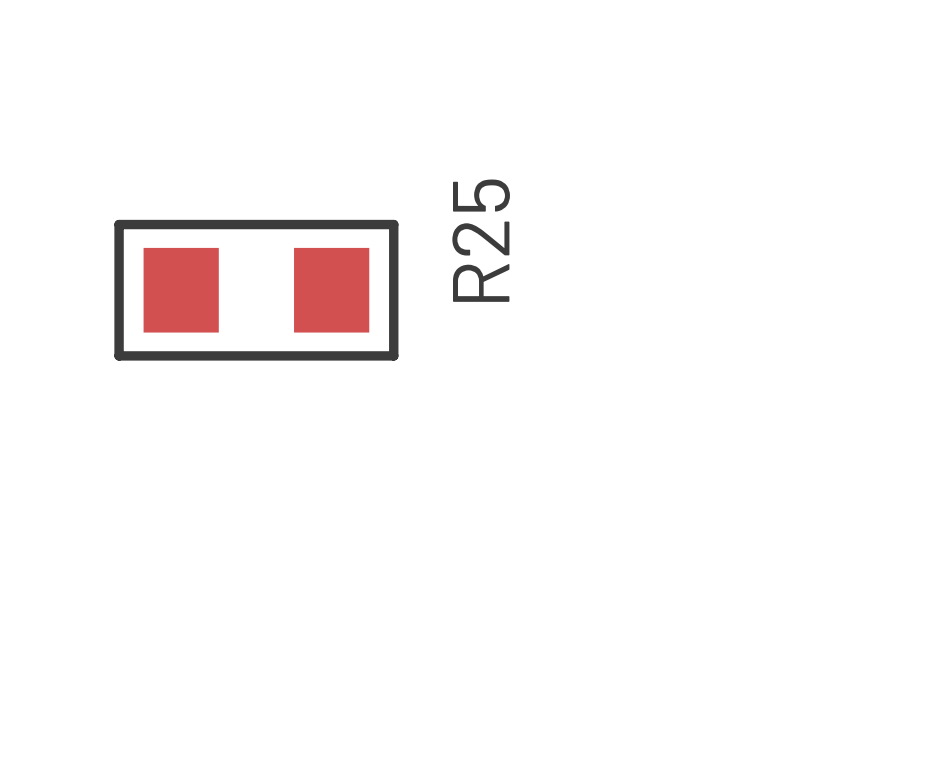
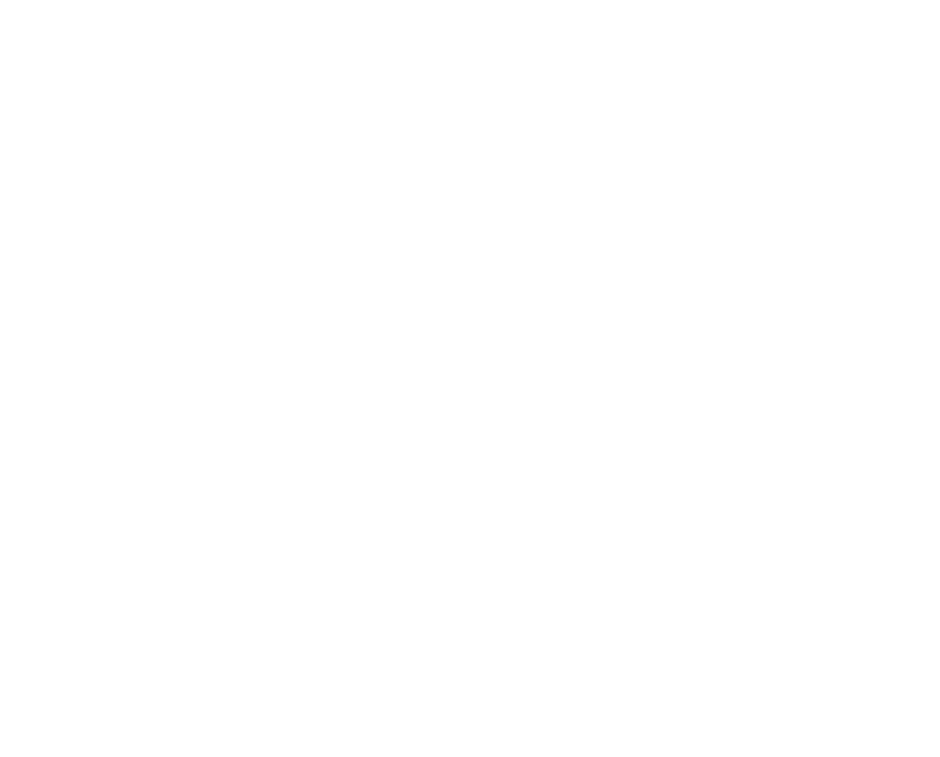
R25: (256, 290) -> none

